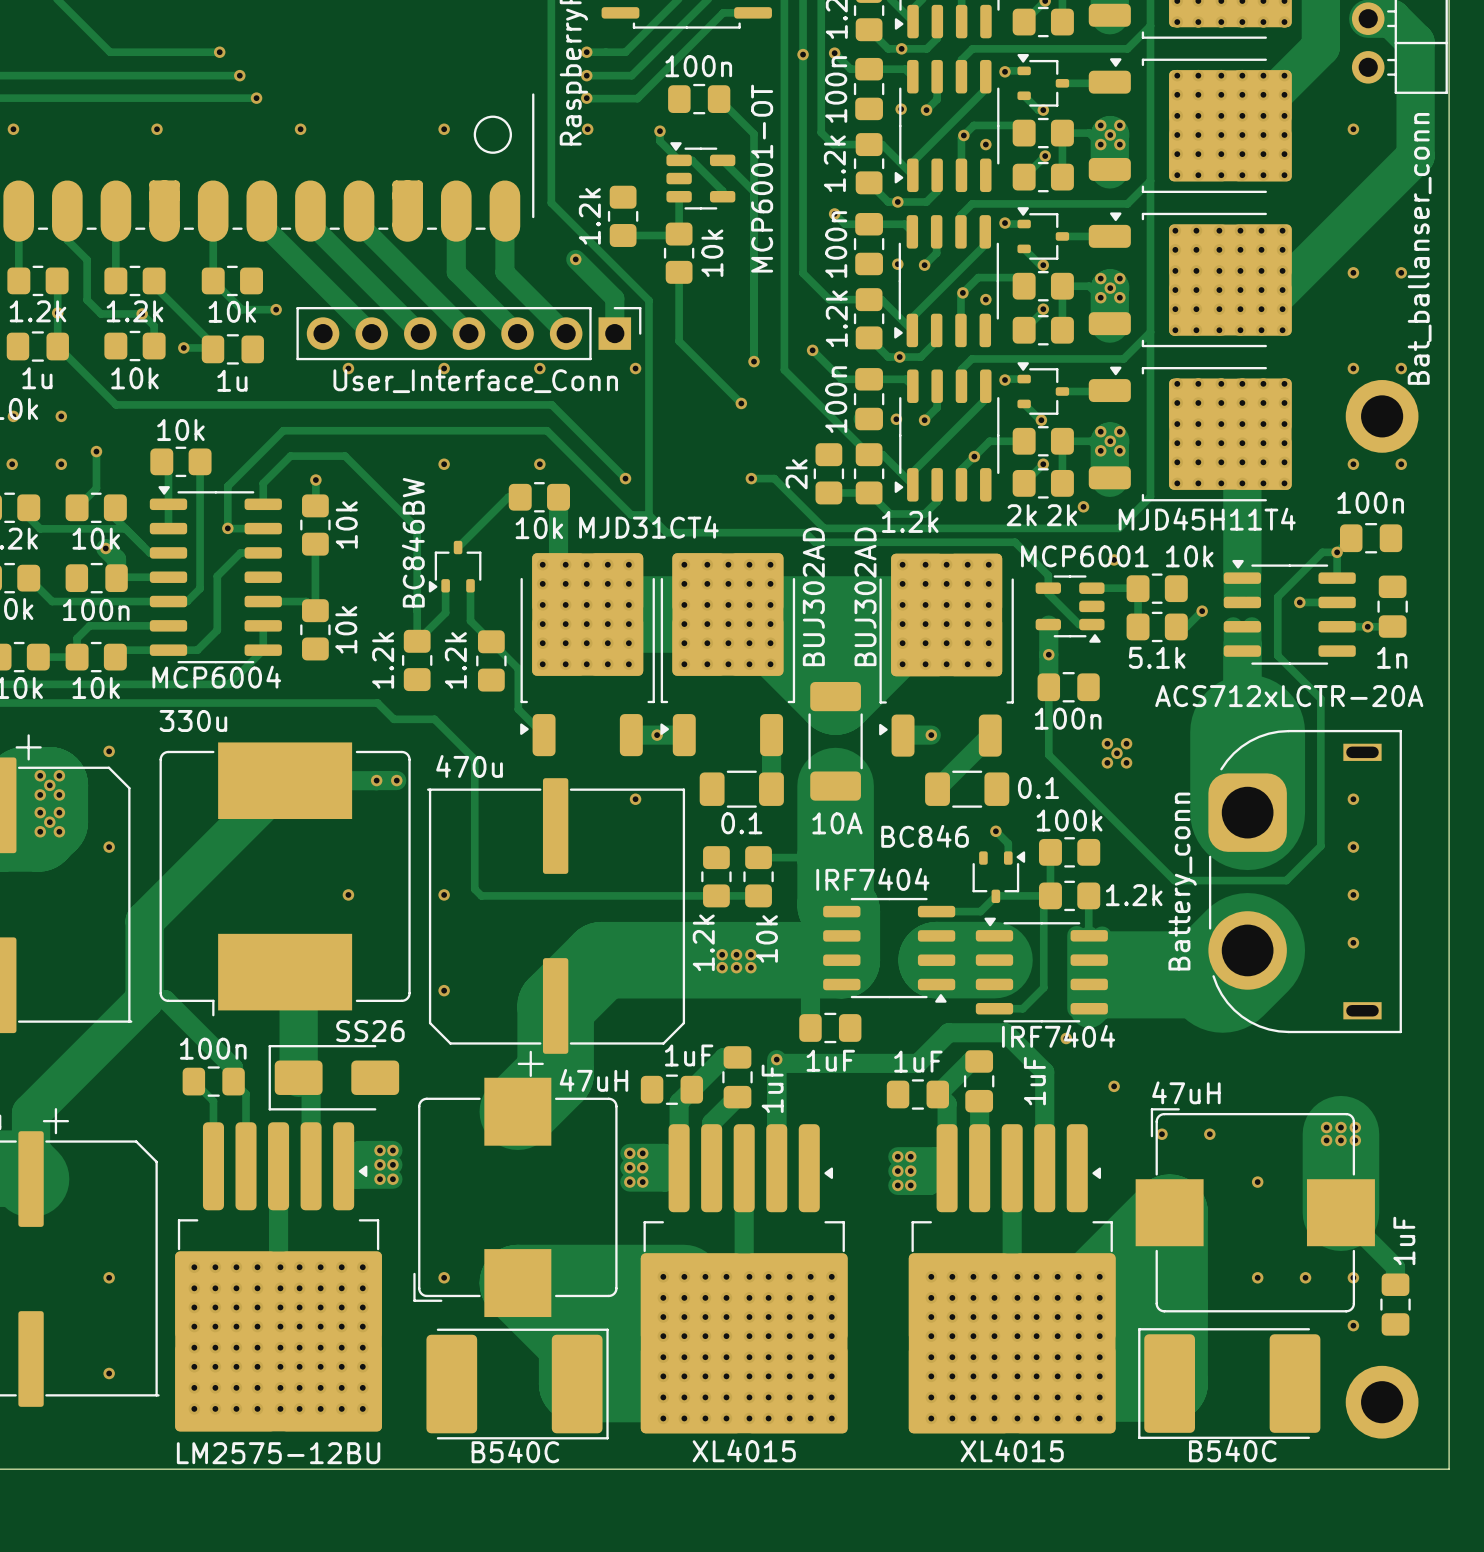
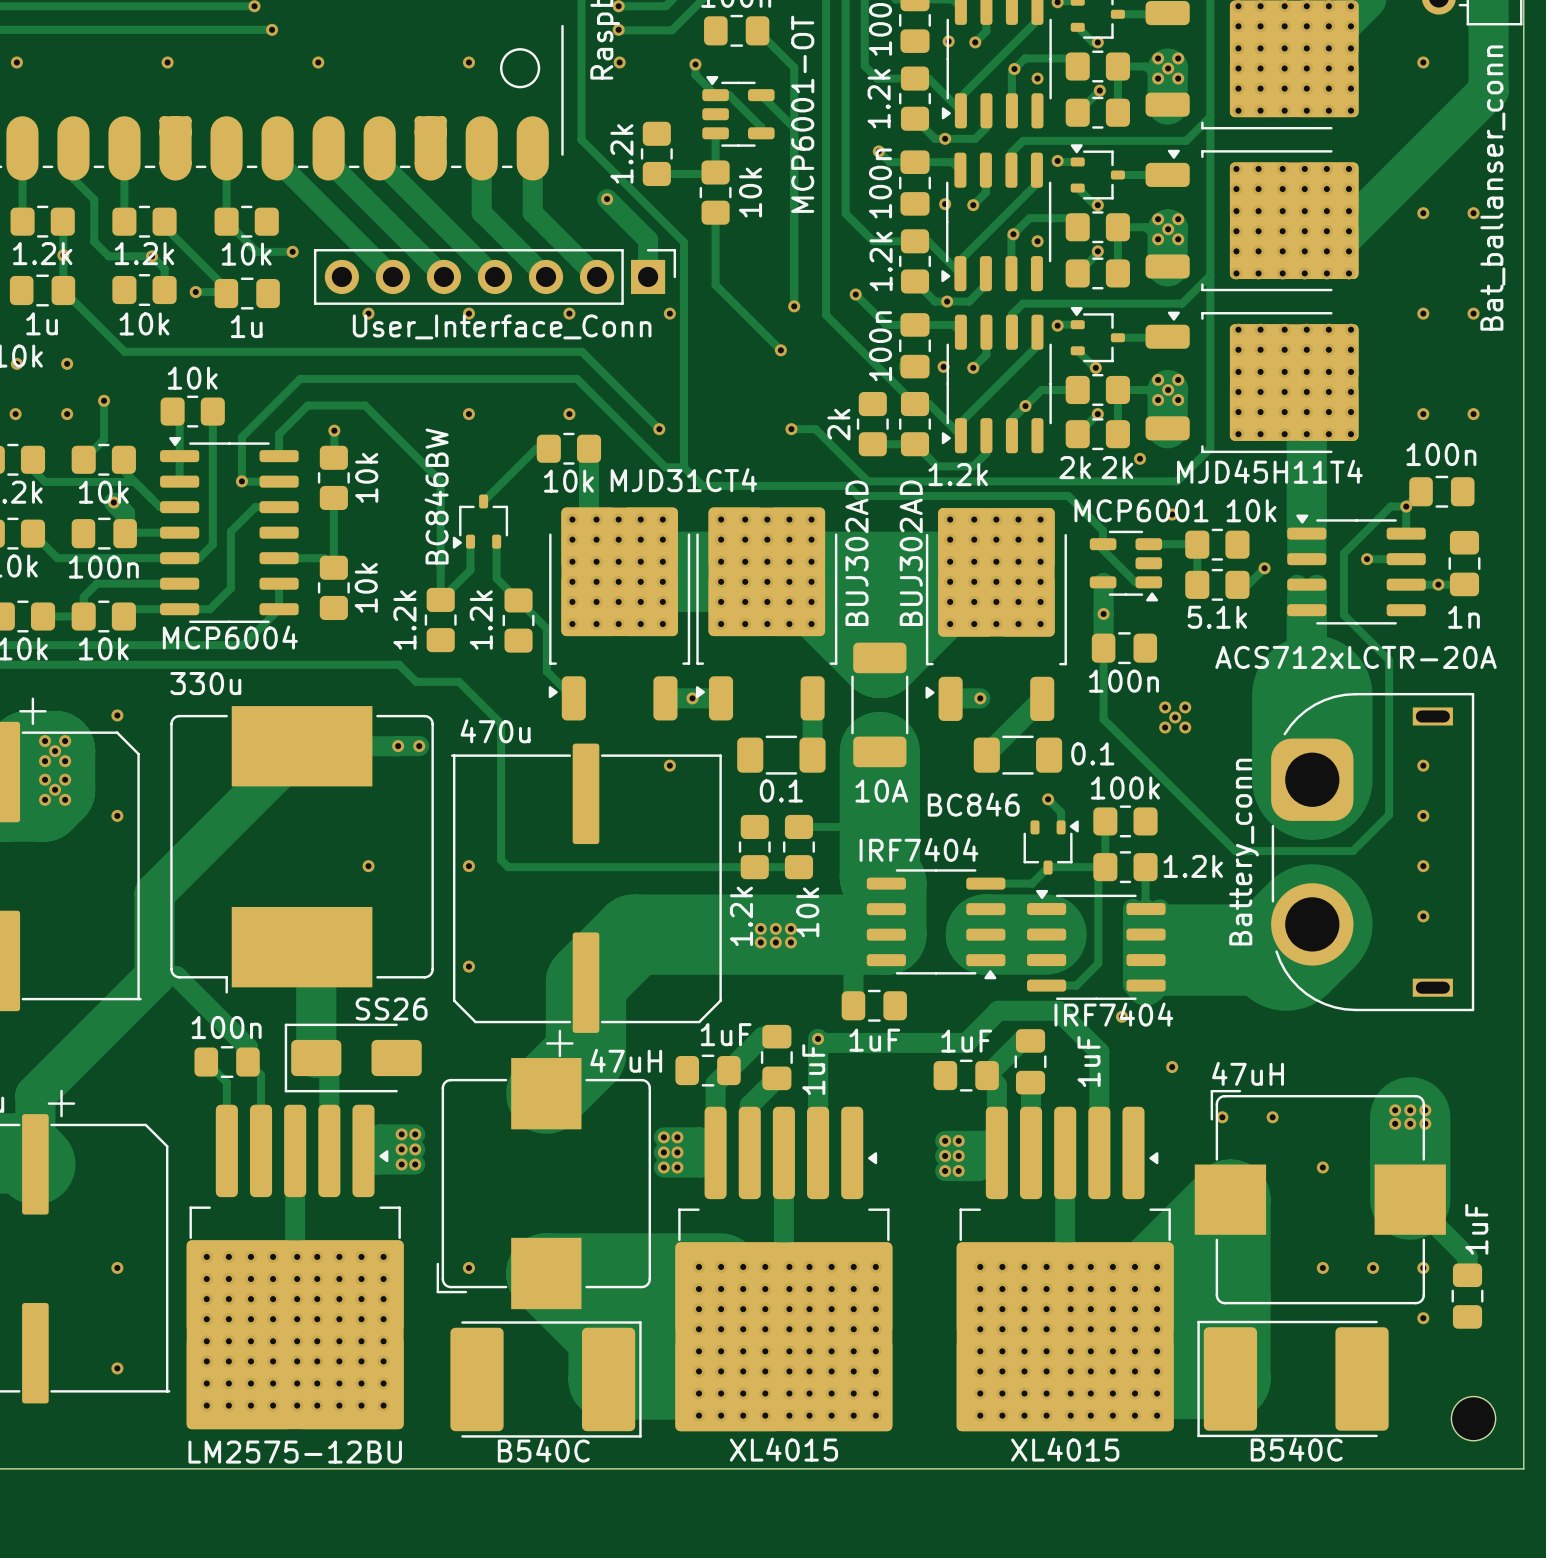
part: (1382, 416) -> none
part: (1382, 1402) -> none
part: none -> (1473, 1418)

